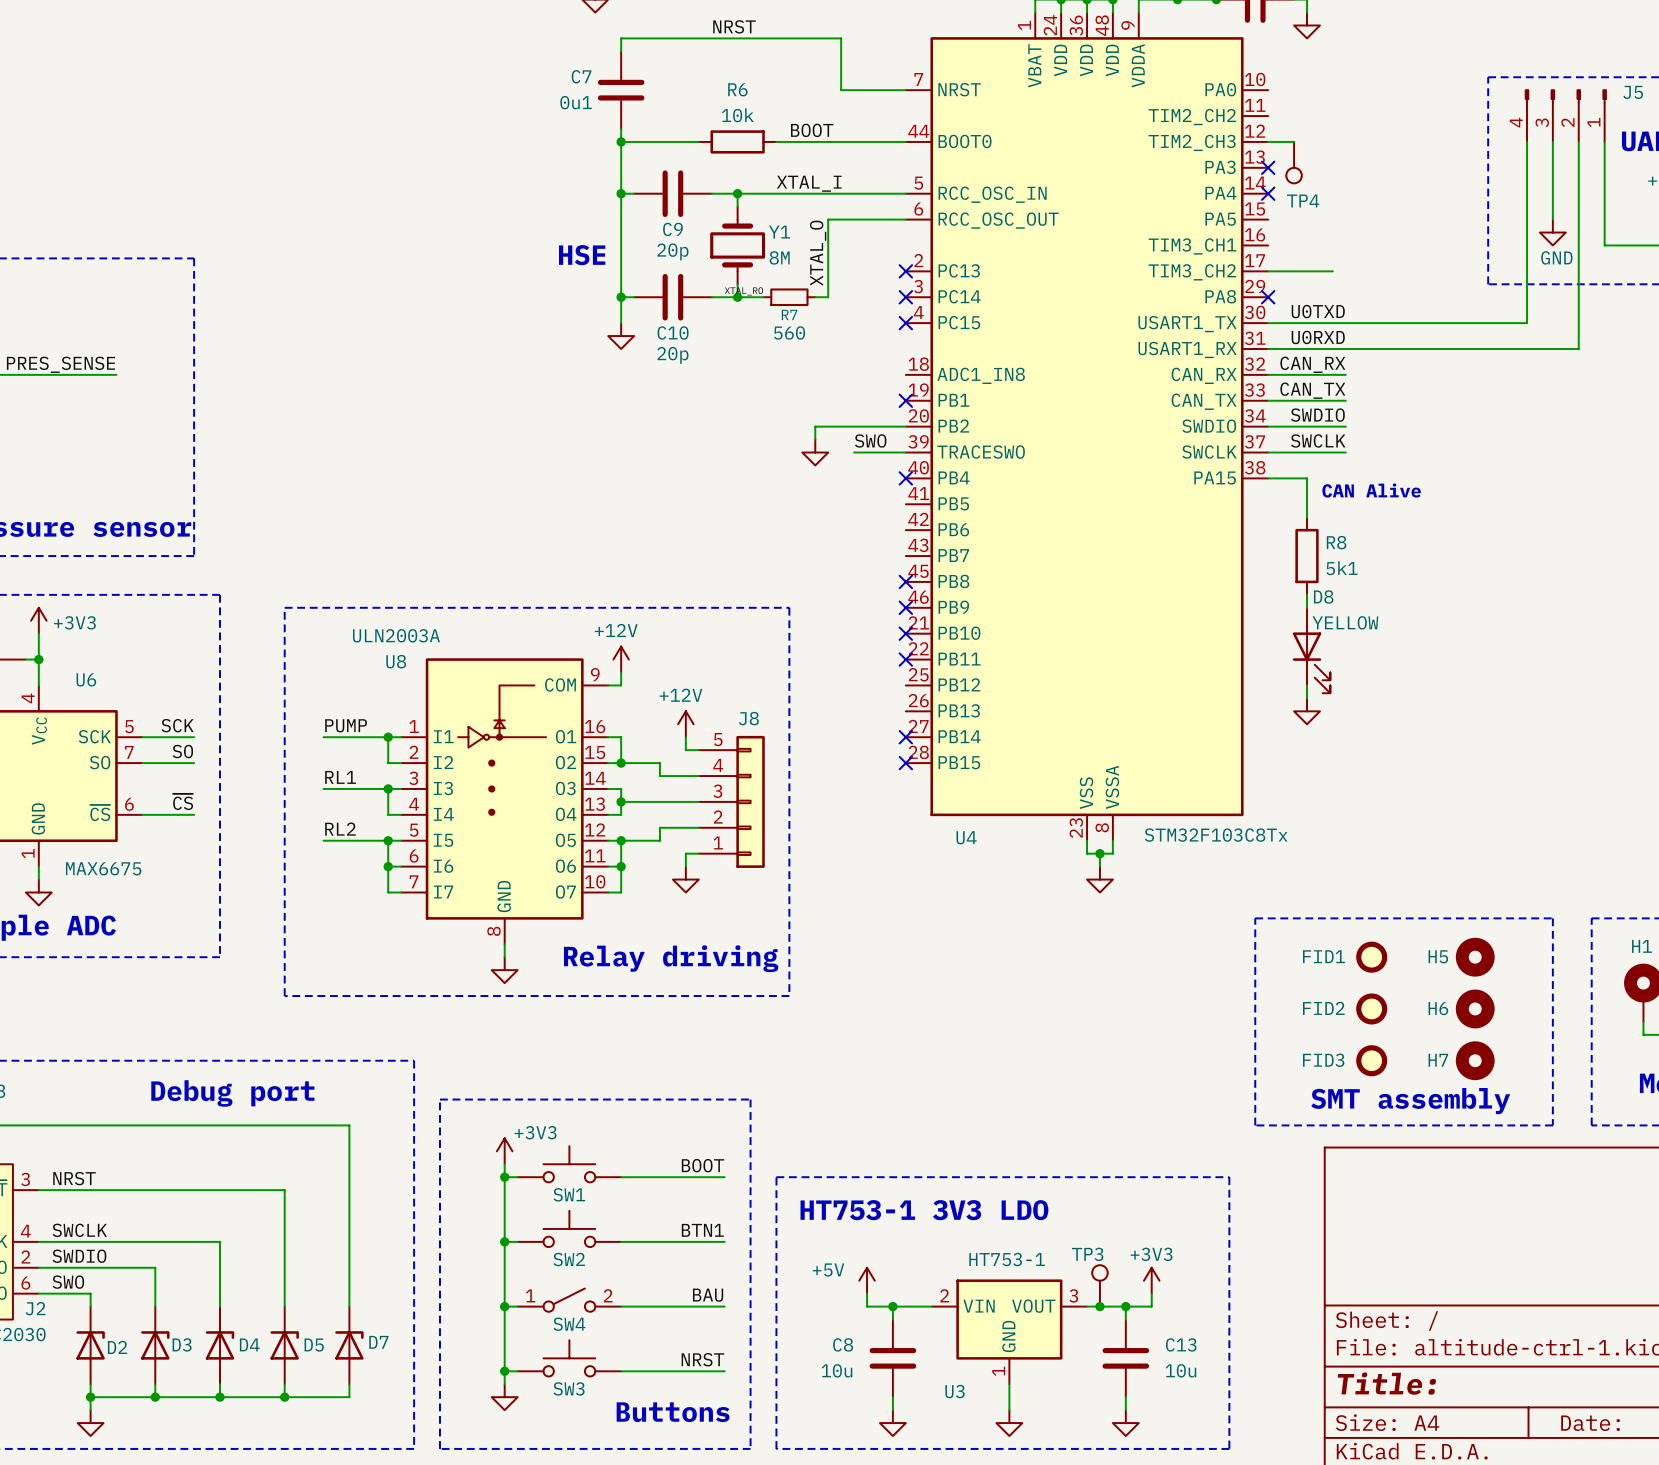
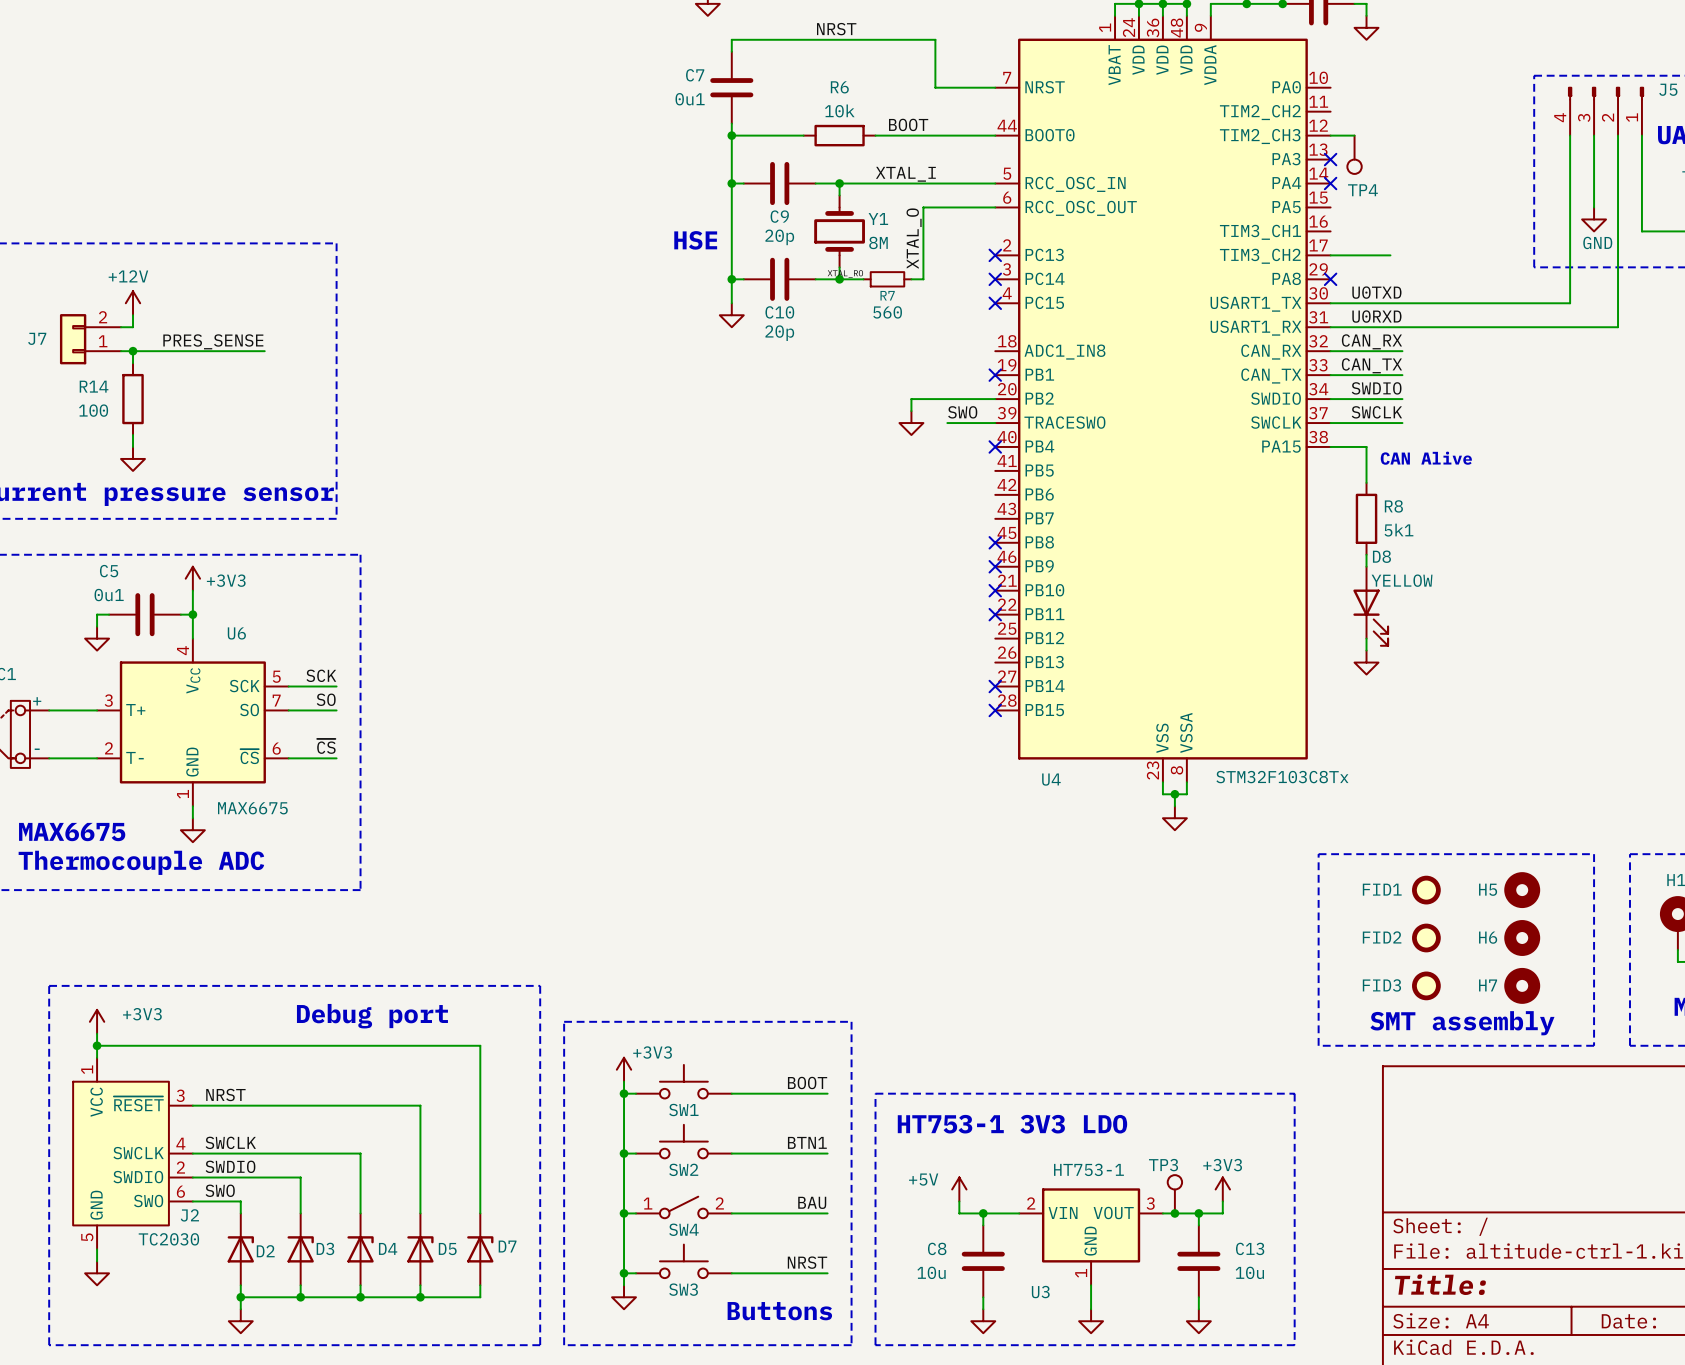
line: (284, 607) (789, 607) (789, 996) (284, 996) (284, 607) -> none
power symbol: +12V (621, 659) -> none
wire: (621, 672) (621, 685) (608, 685) -> none
power symbol: +12V (685, 724) -> none
label: PUMP (346, 725) -> none
wire: (323, 737) (401, 737) -> none
wire: (388, 737) (388, 763) (401, 763) -> none
junction: (388, 737) -> none
wire: (608, 737) (621, 737) (621, 763) -> none
wire: (685, 737) (685, 750) (698, 750) -> none
wire: (608, 763) (659, 763) (659, 776) (698, 776) -> none
junction: (621, 763) -> none
label: RL1 (340, 777) -> none
wire: (323, 788) (401, 788) -> none
wire: (388, 788) (388, 814) (401, 814) -> none
junction: (388, 788) -> none
wire: (608, 788) (621, 788) (621, 814) (608, 814) -> none
U8: ULN2003A (504, 801) -> none
wire: (621, 801) (698, 801) -> none
junction: (621, 801) -> none
J8: (731, 801) -> none
wire: (698, 827) (659, 827) (659, 840) (608, 840) -> none
label: RL2 (340, 829) -> none
wire: (323, 840) (401, 840) -> none
wire: (388, 840) (388, 892) (401, 892) -> none
junction: (388, 840) -> none
wire: (621, 840) (621, 892) (608, 892) -> none
junction: (621, 840) -> none
wire: (698, 853) (685, 853) (685, 866) -> none
wire: (388, 866) (401, 866) -> none
junction: (388, 866) -> none
wire: (608, 866) (621, 866) -> none
junction: (621, 866) -> none
power symbol: (685, 879) -> none
wire: (504, 944) (504, 957) -> none
text: Relay driving (671, 958) -> none
power symbol: (504, 970) -> none

